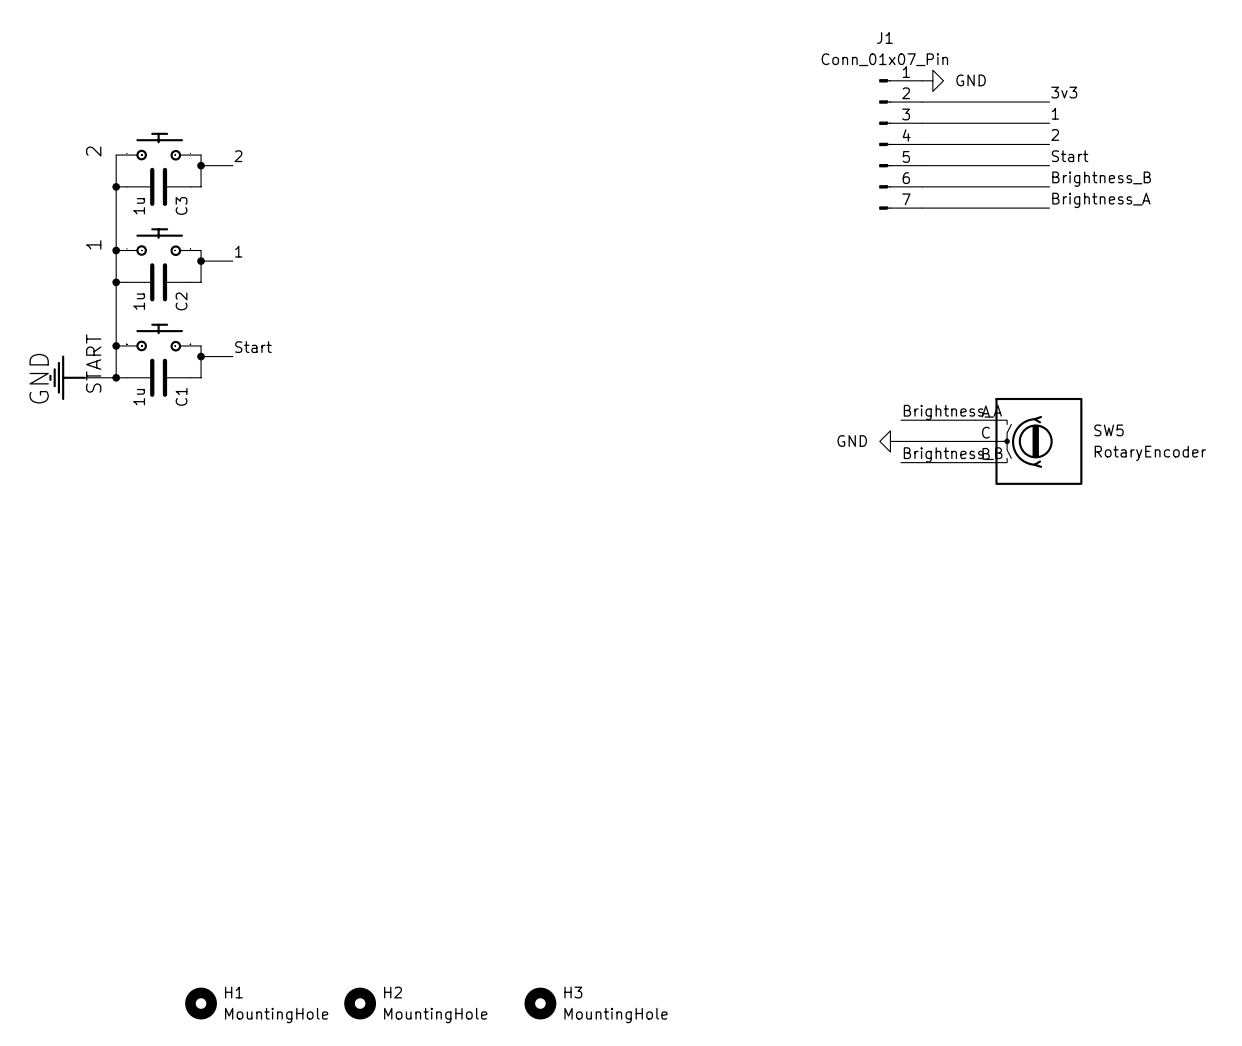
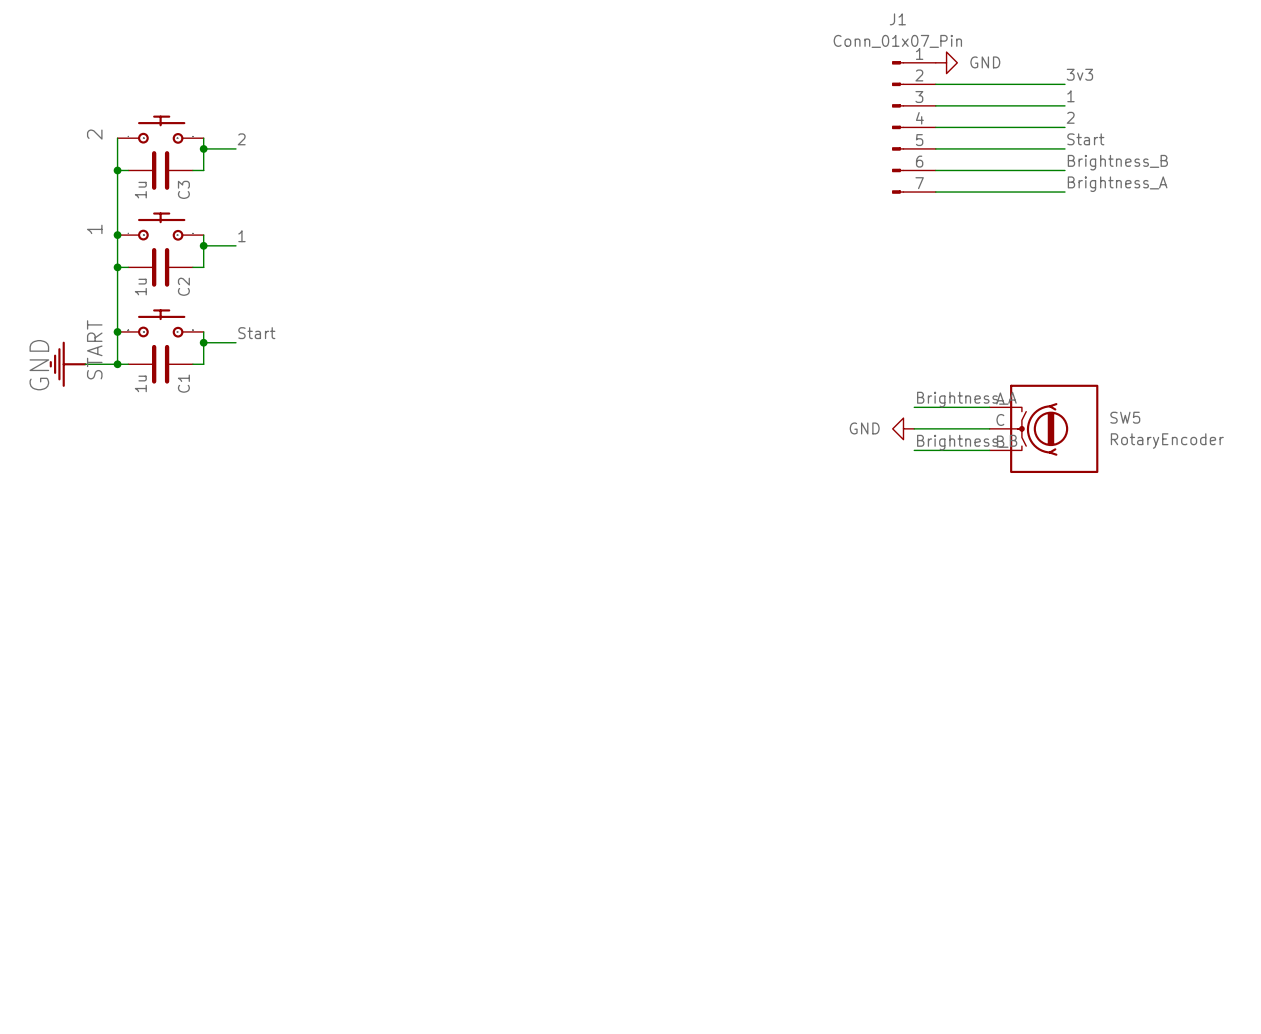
H1: MountingHole (201, 1003) -> none
H2: MountingHole (360, 1003) -> none
H3: MountingHole (540, 1003) -> none

